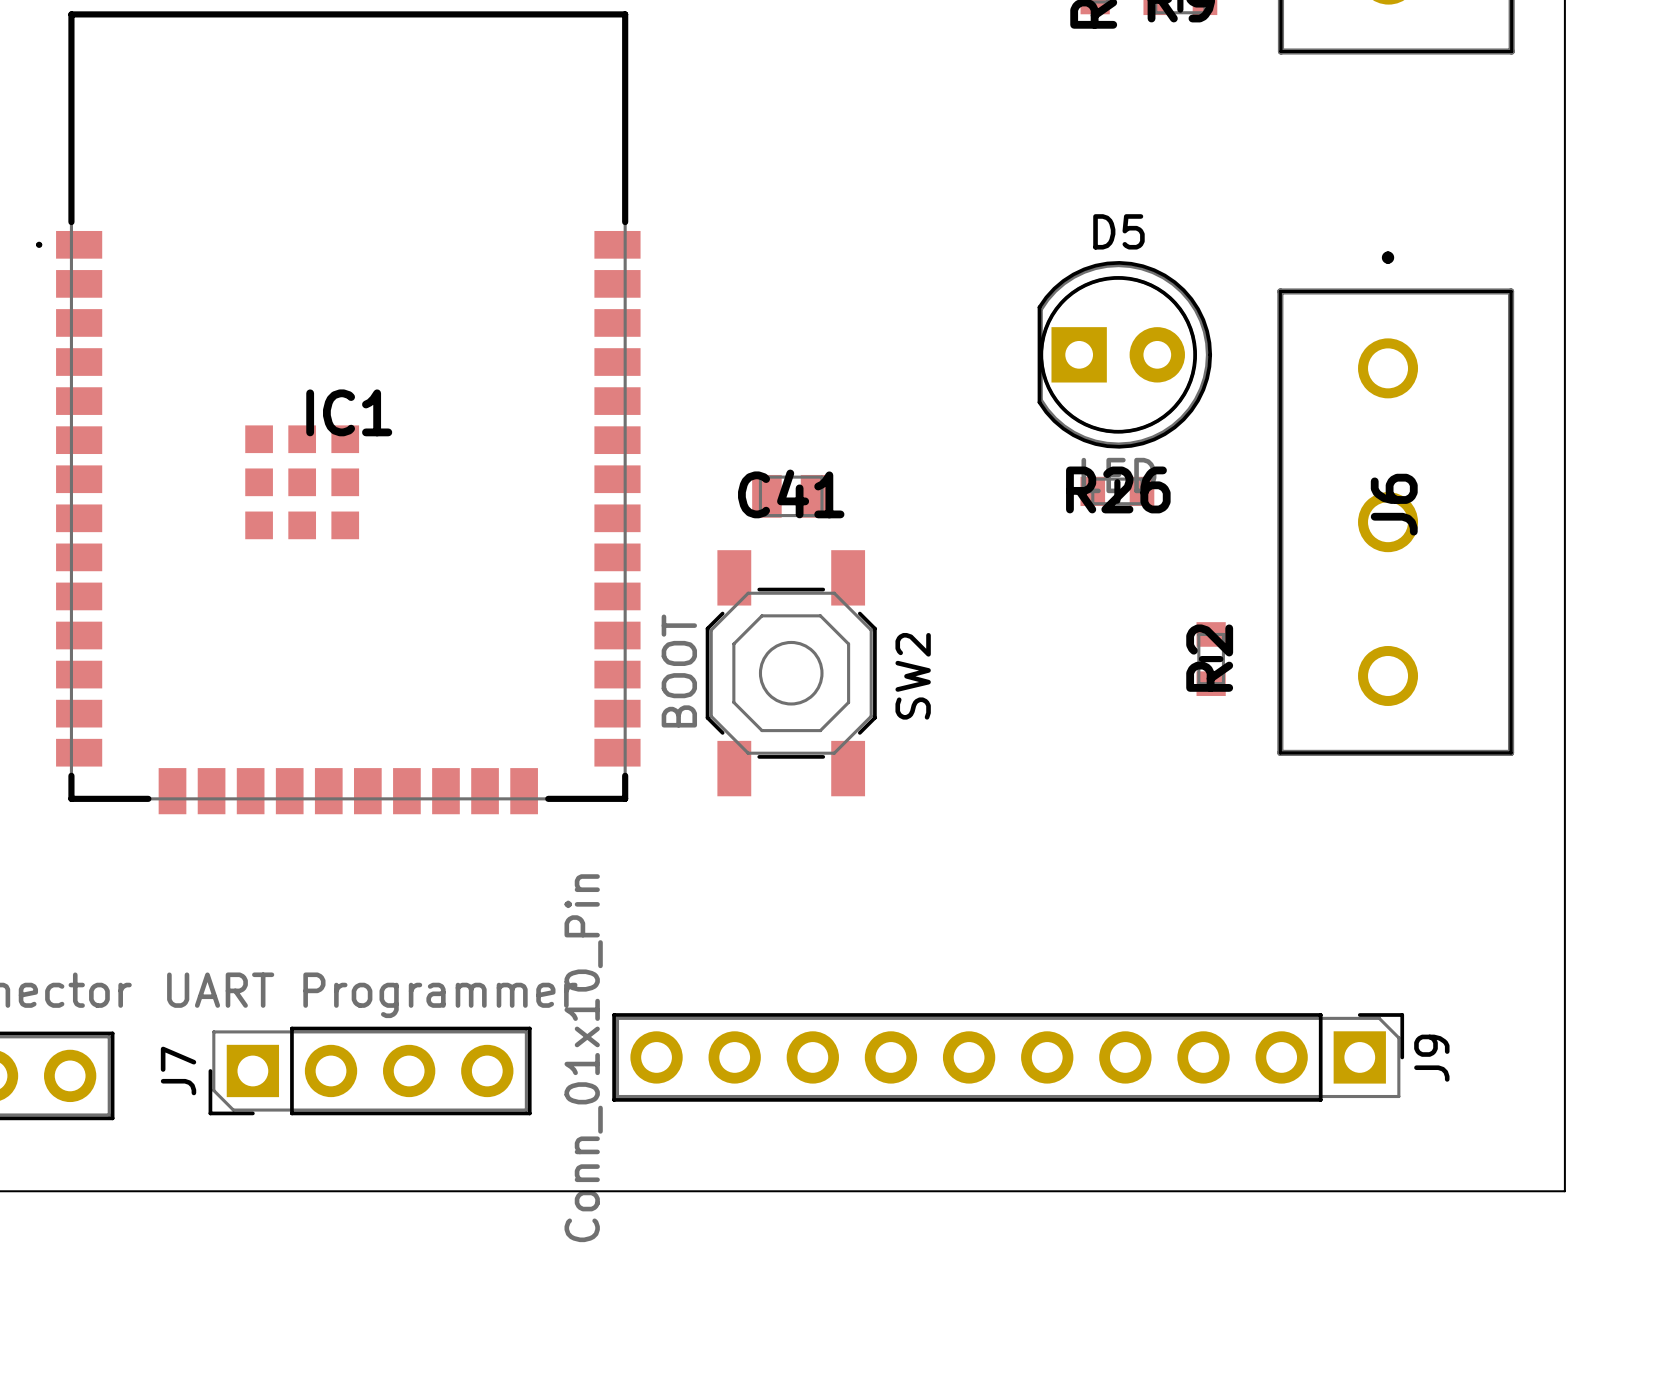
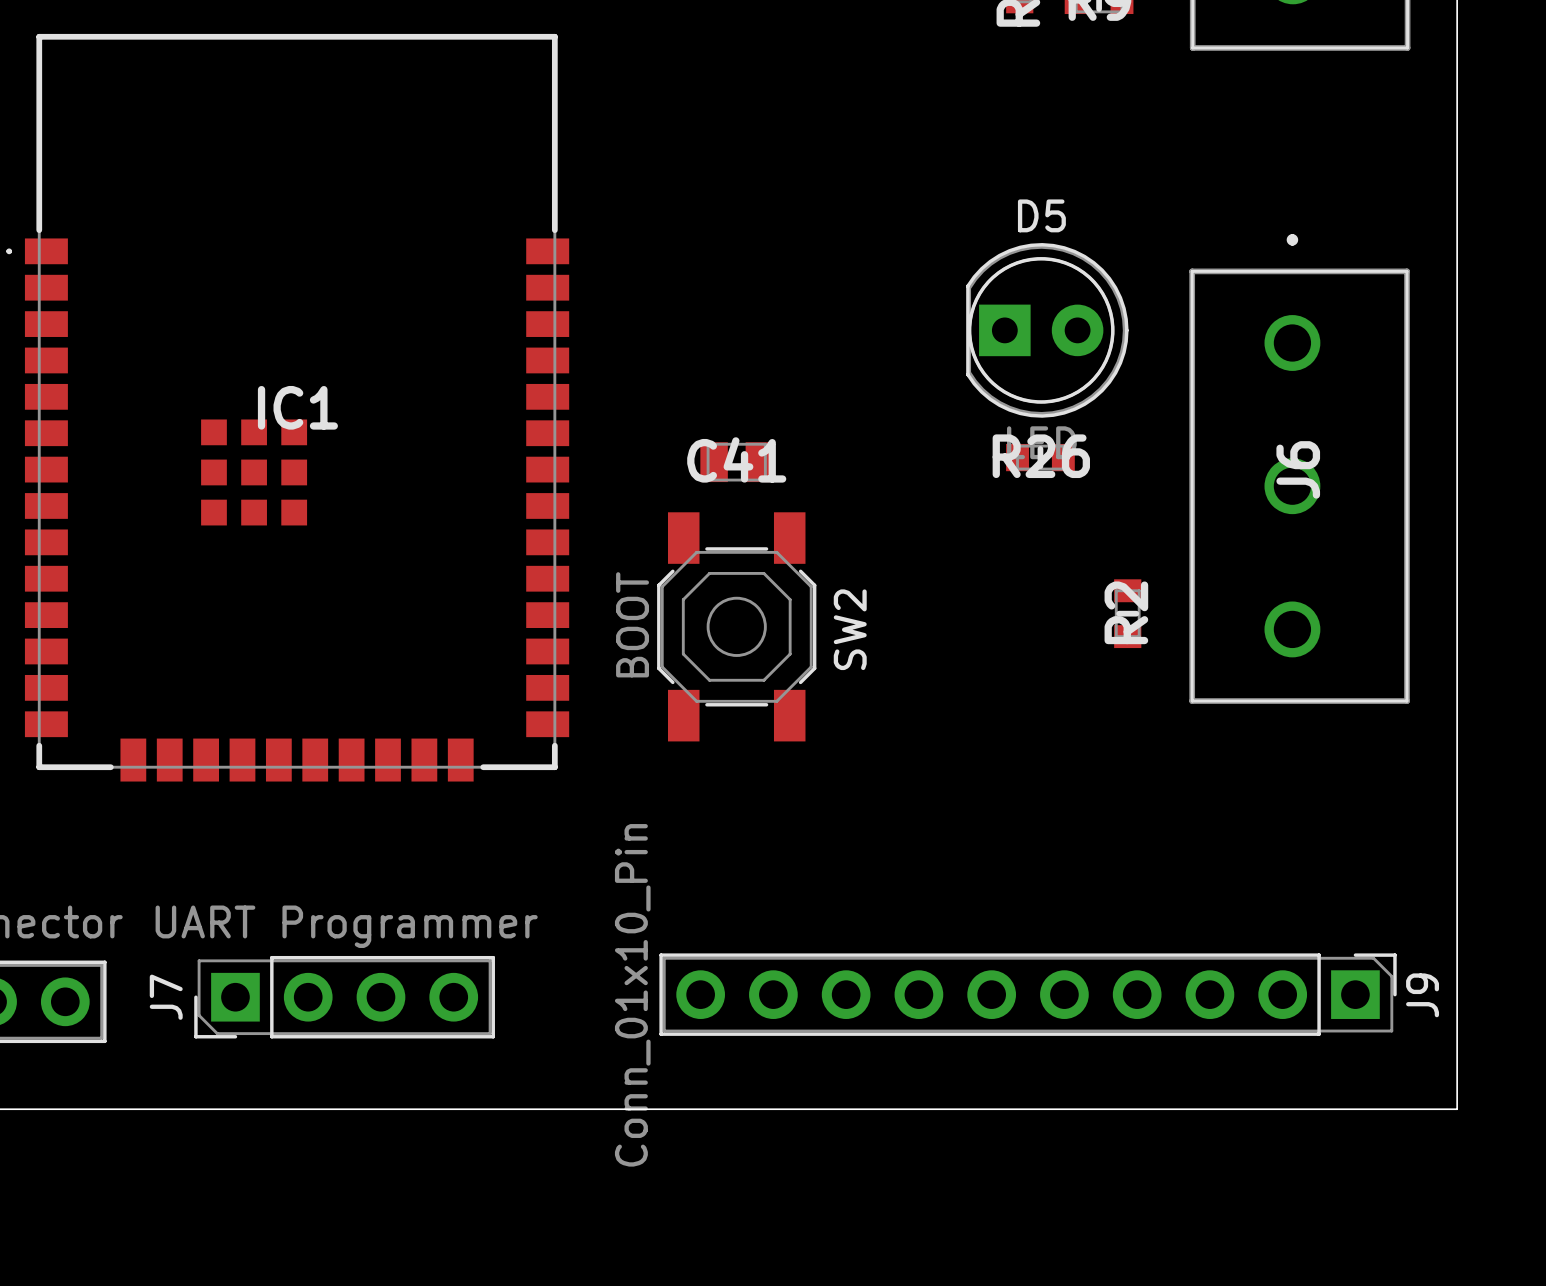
IC1 position: (338, 412) -> (287, 407)
J9 position: (1008, 1057) -> (1028, 994)

